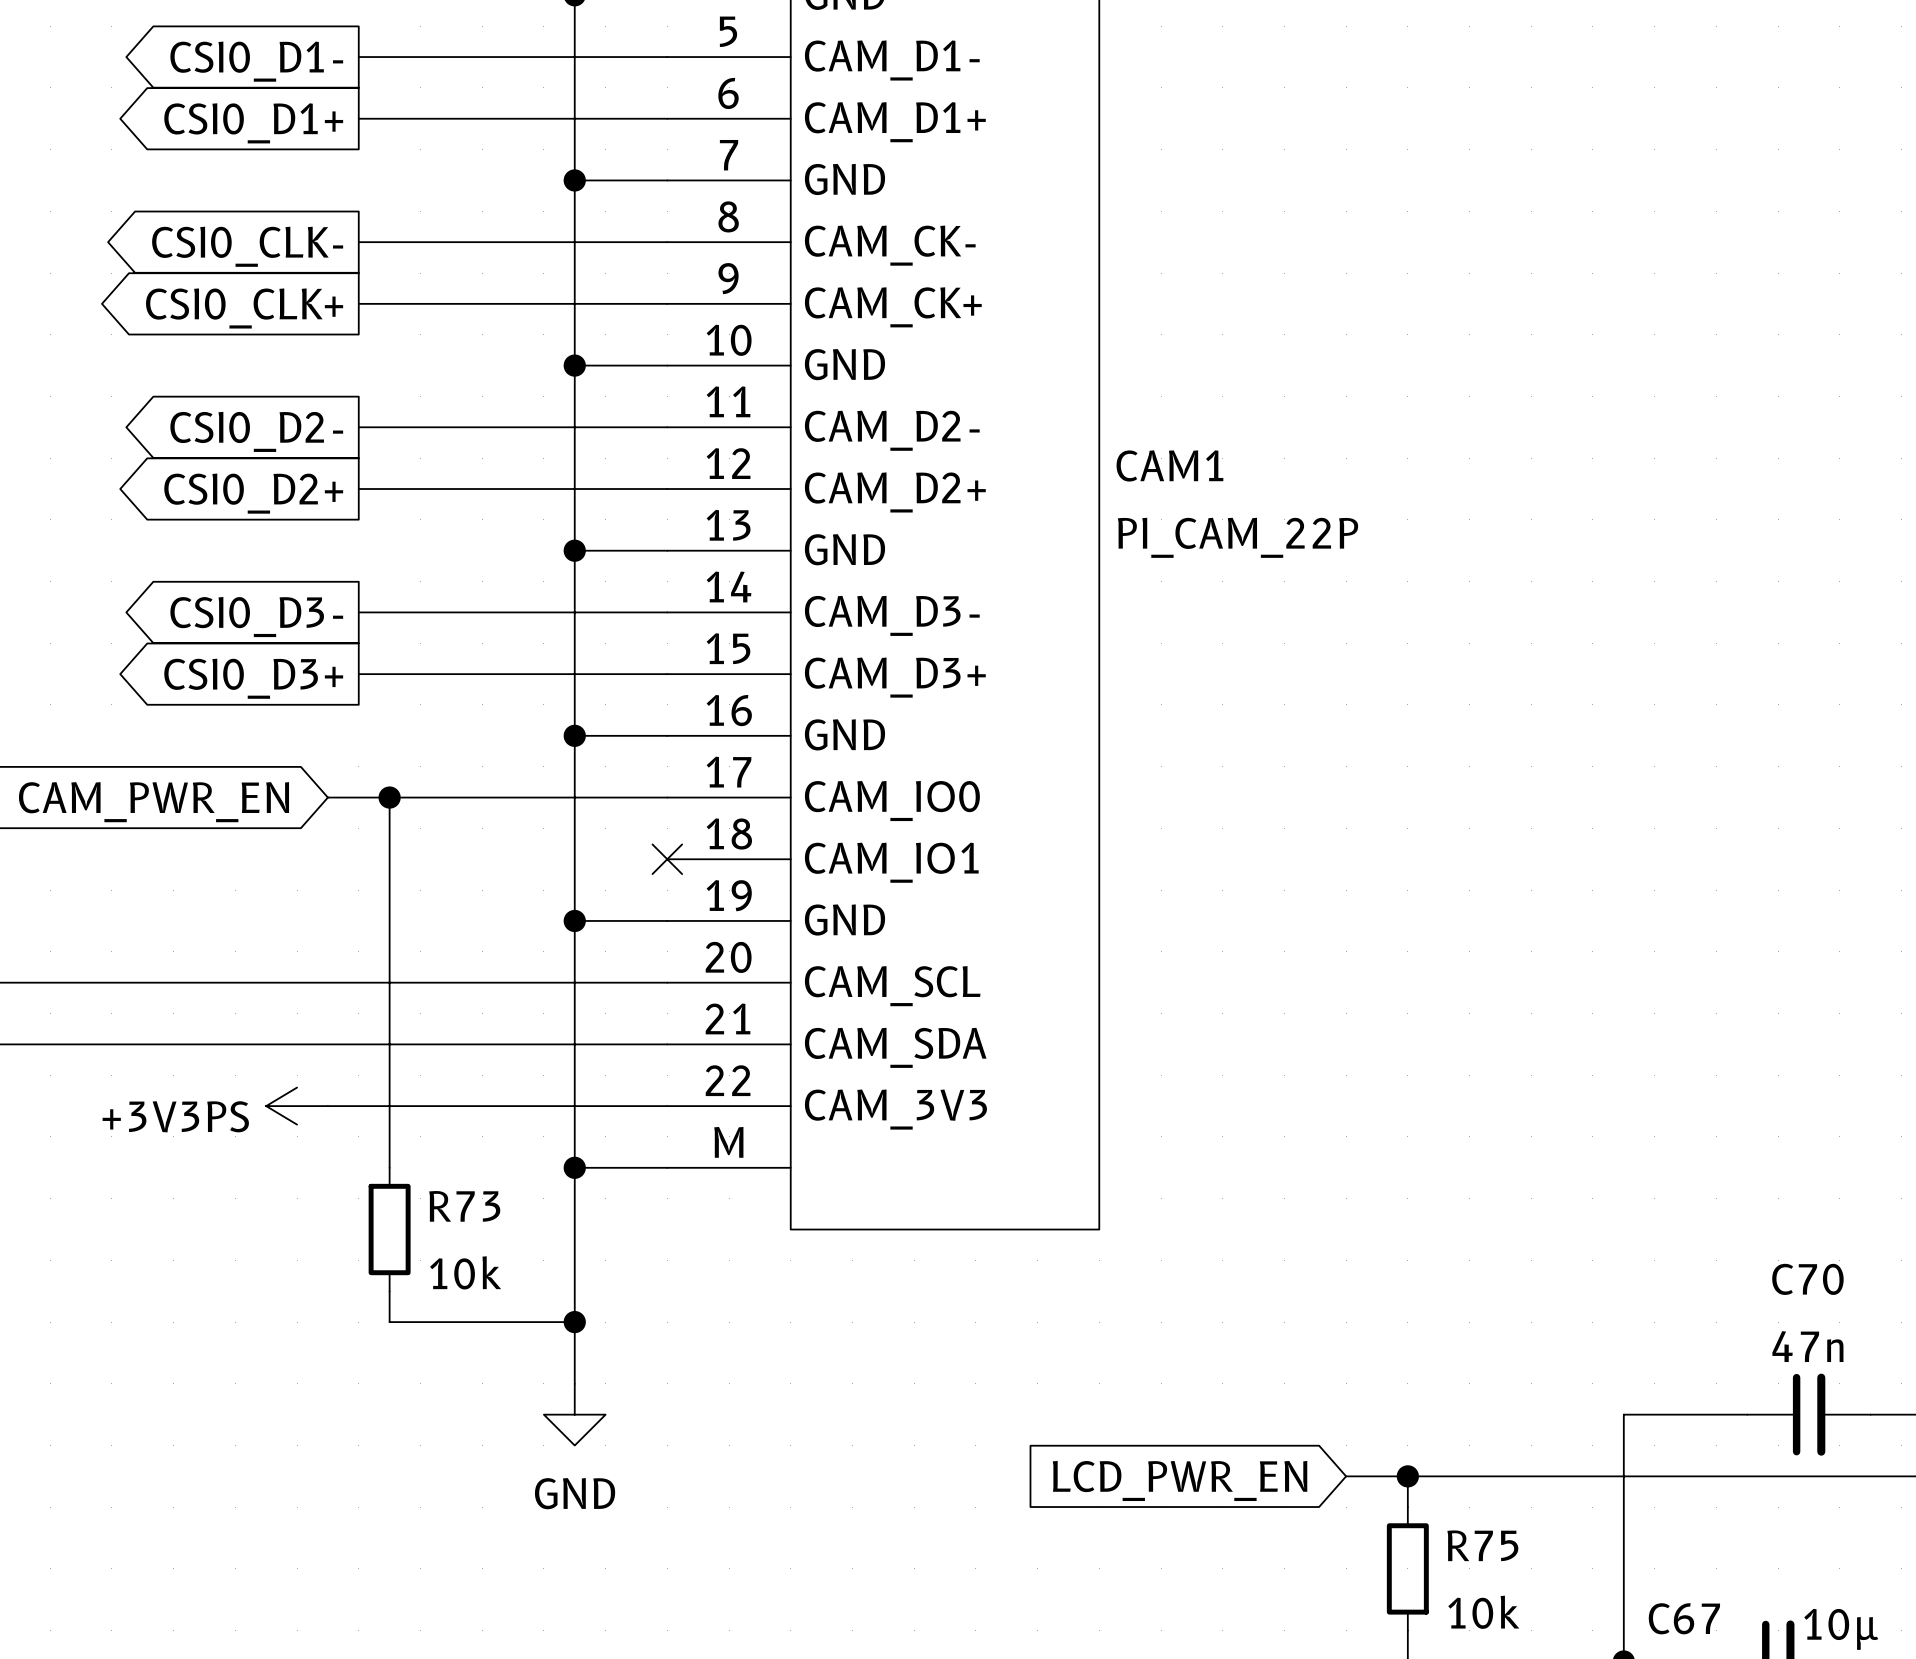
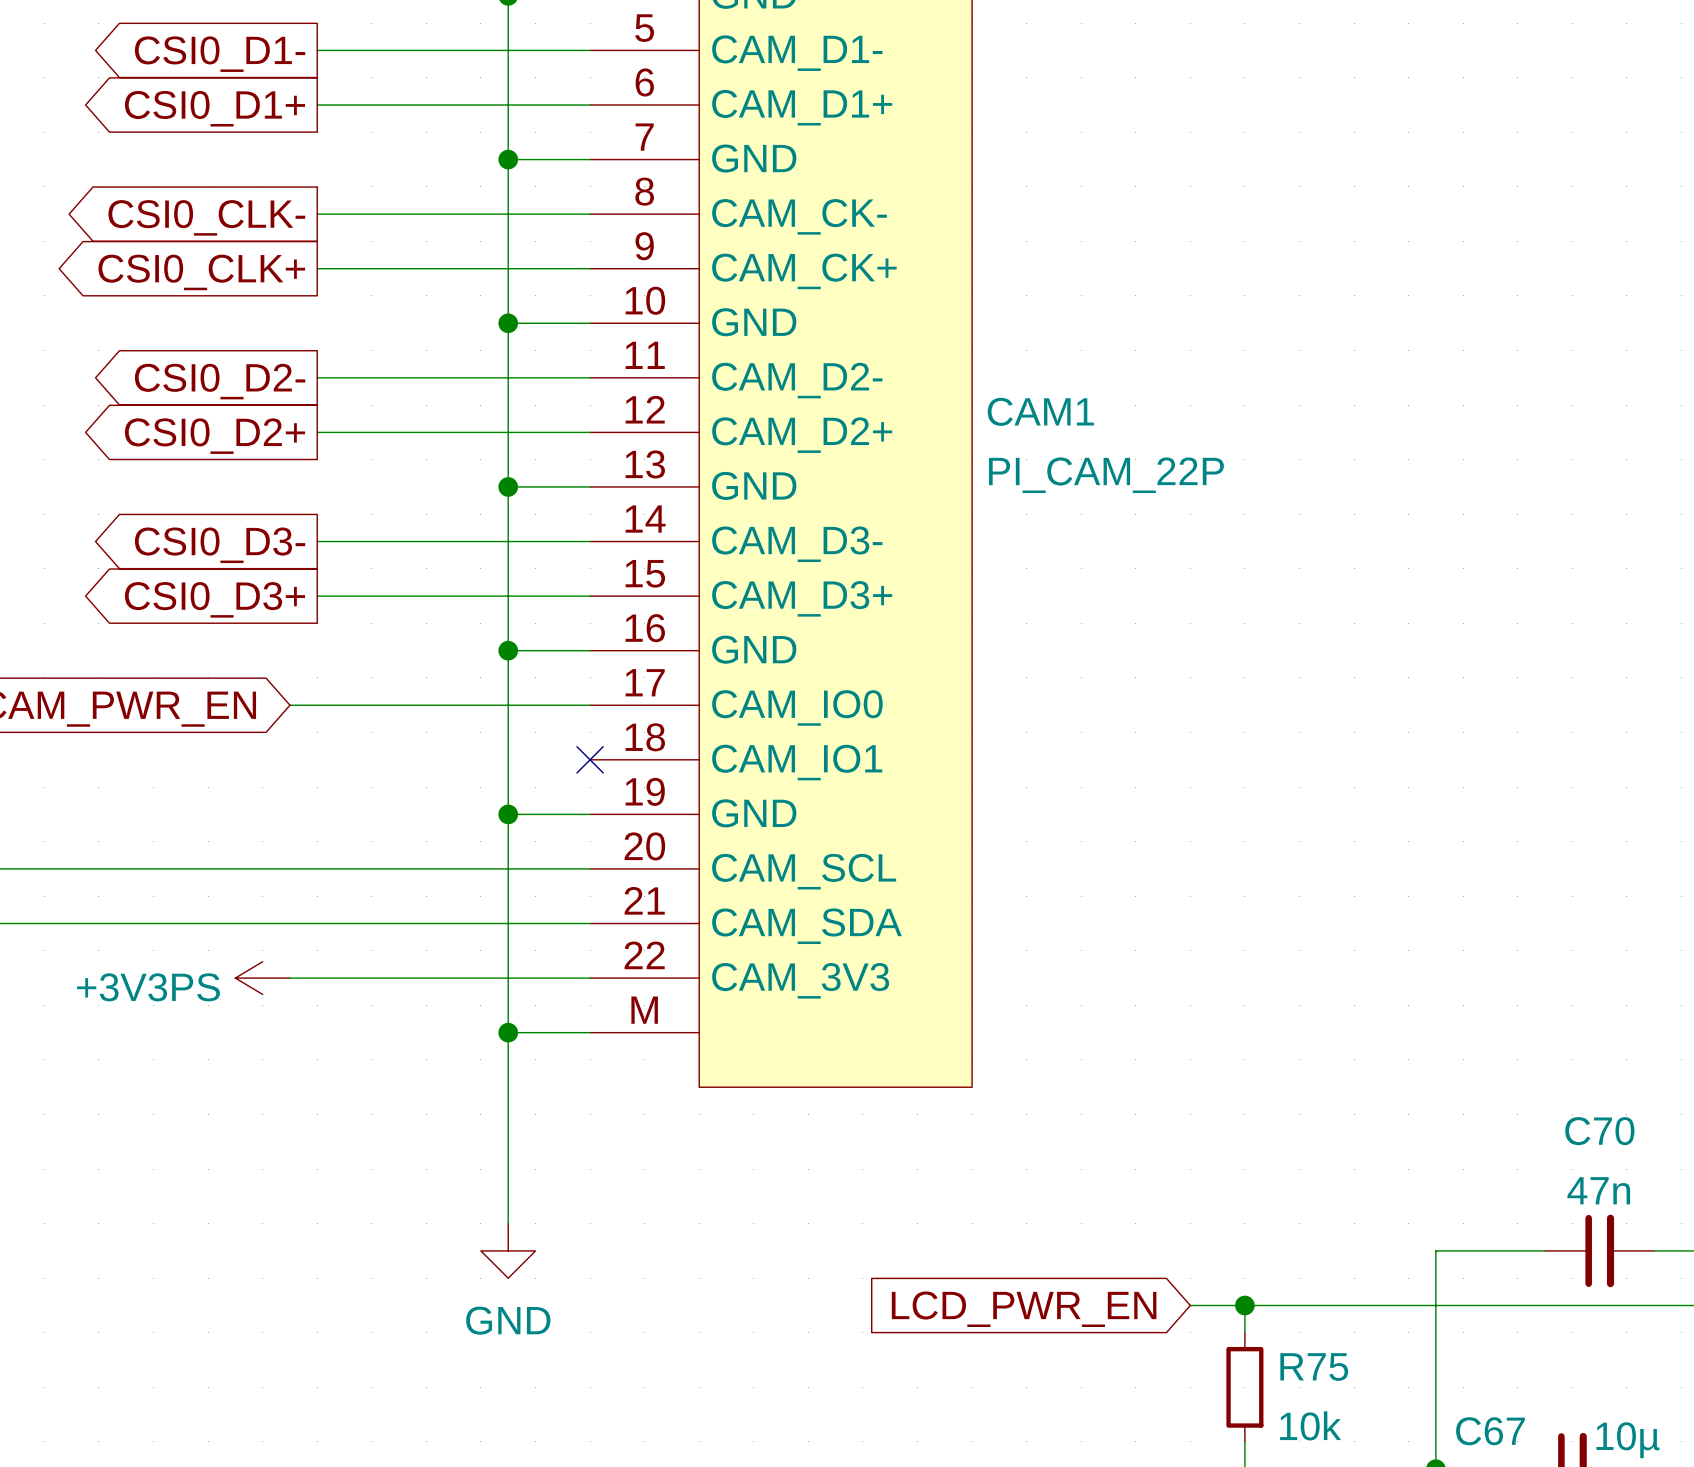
wire: (389, 797) (389, 1167) -> none
junction: (389, 797) -> none
R73: 10k (389, 1229) -> none
wire: (389, 1291) (389, 1322) (574, 1322) -> none
junction: (574, 1322) -> none

